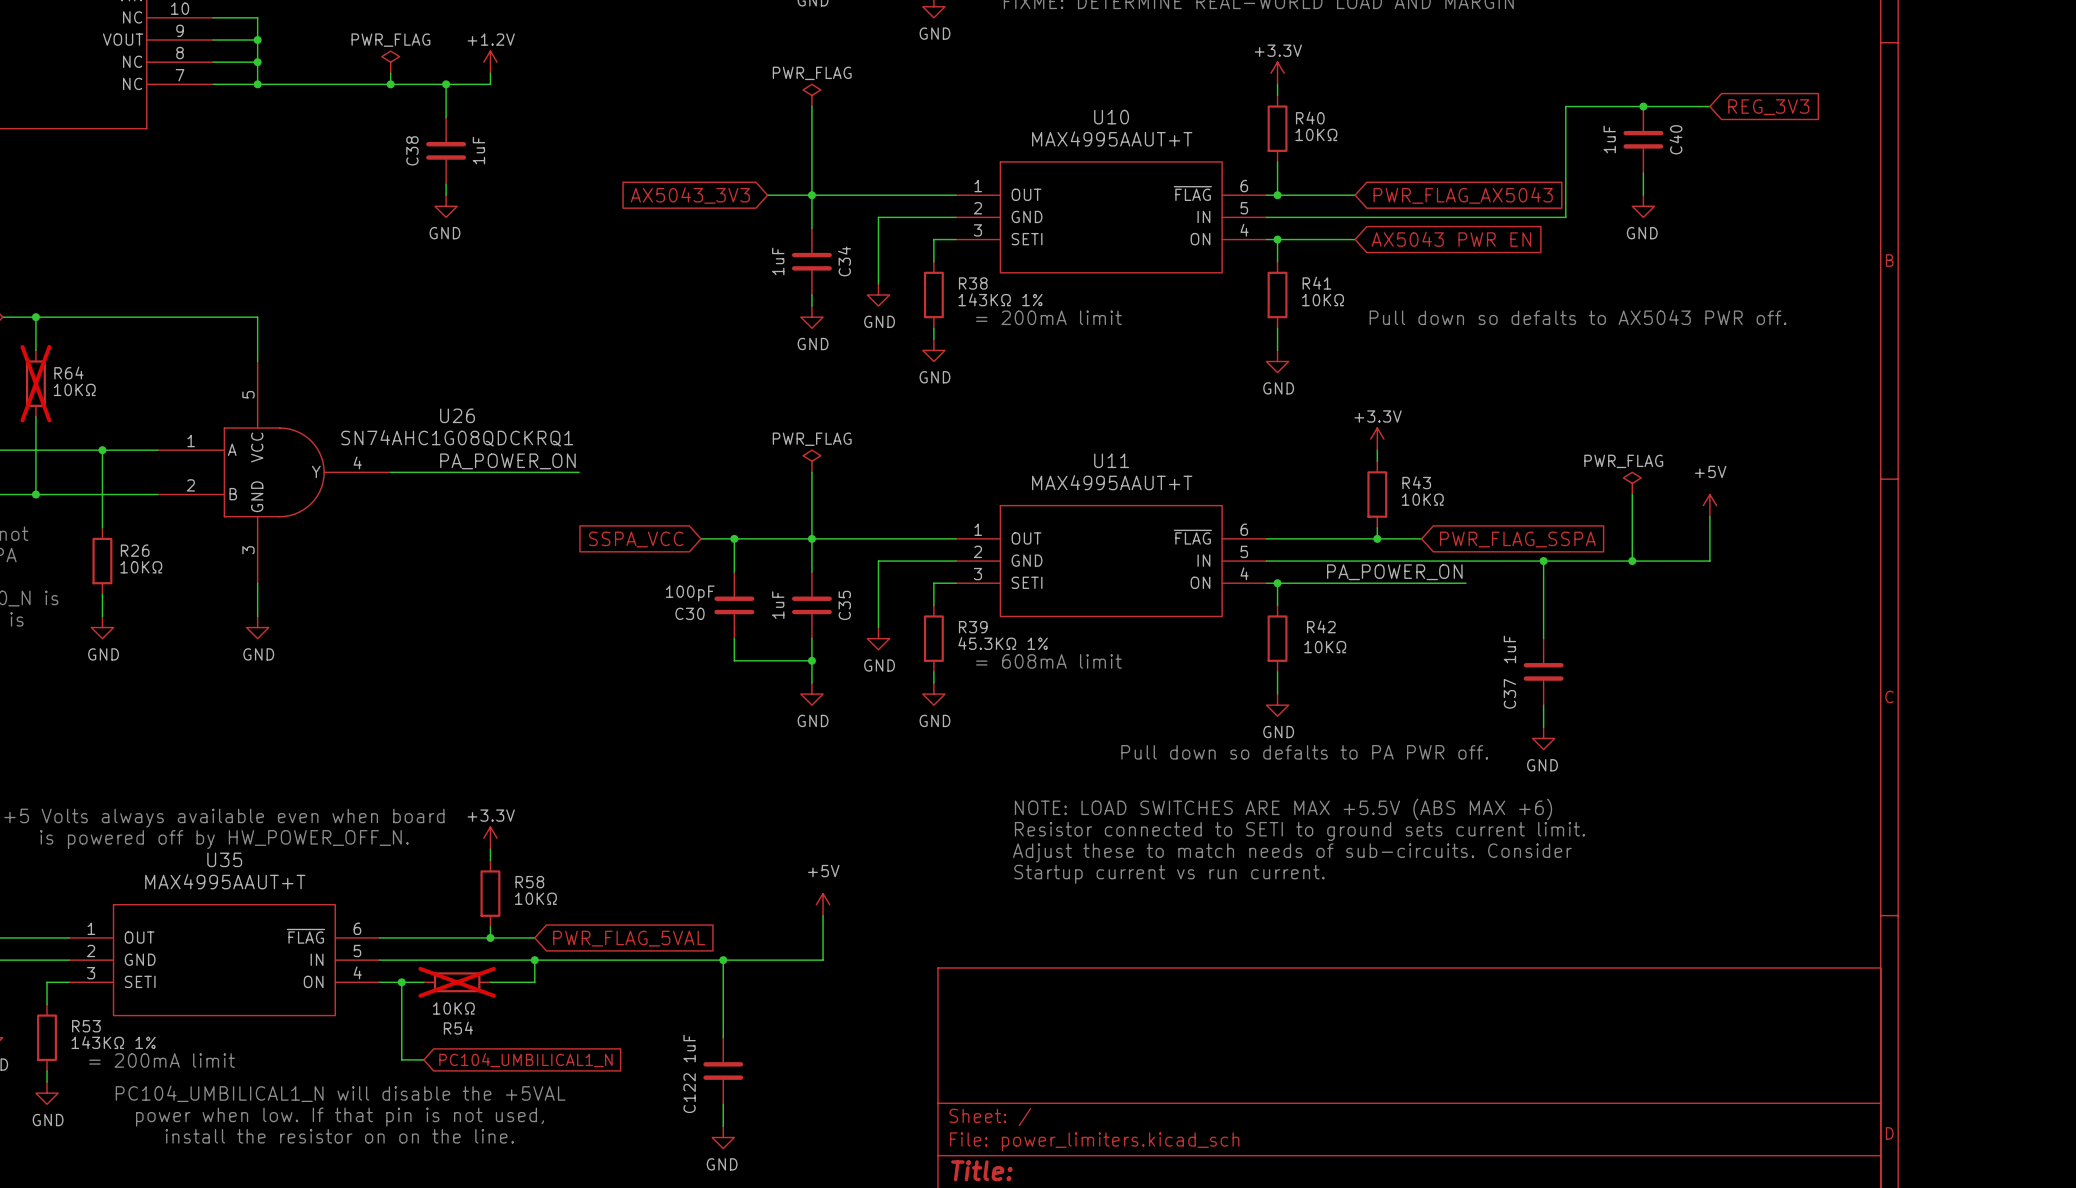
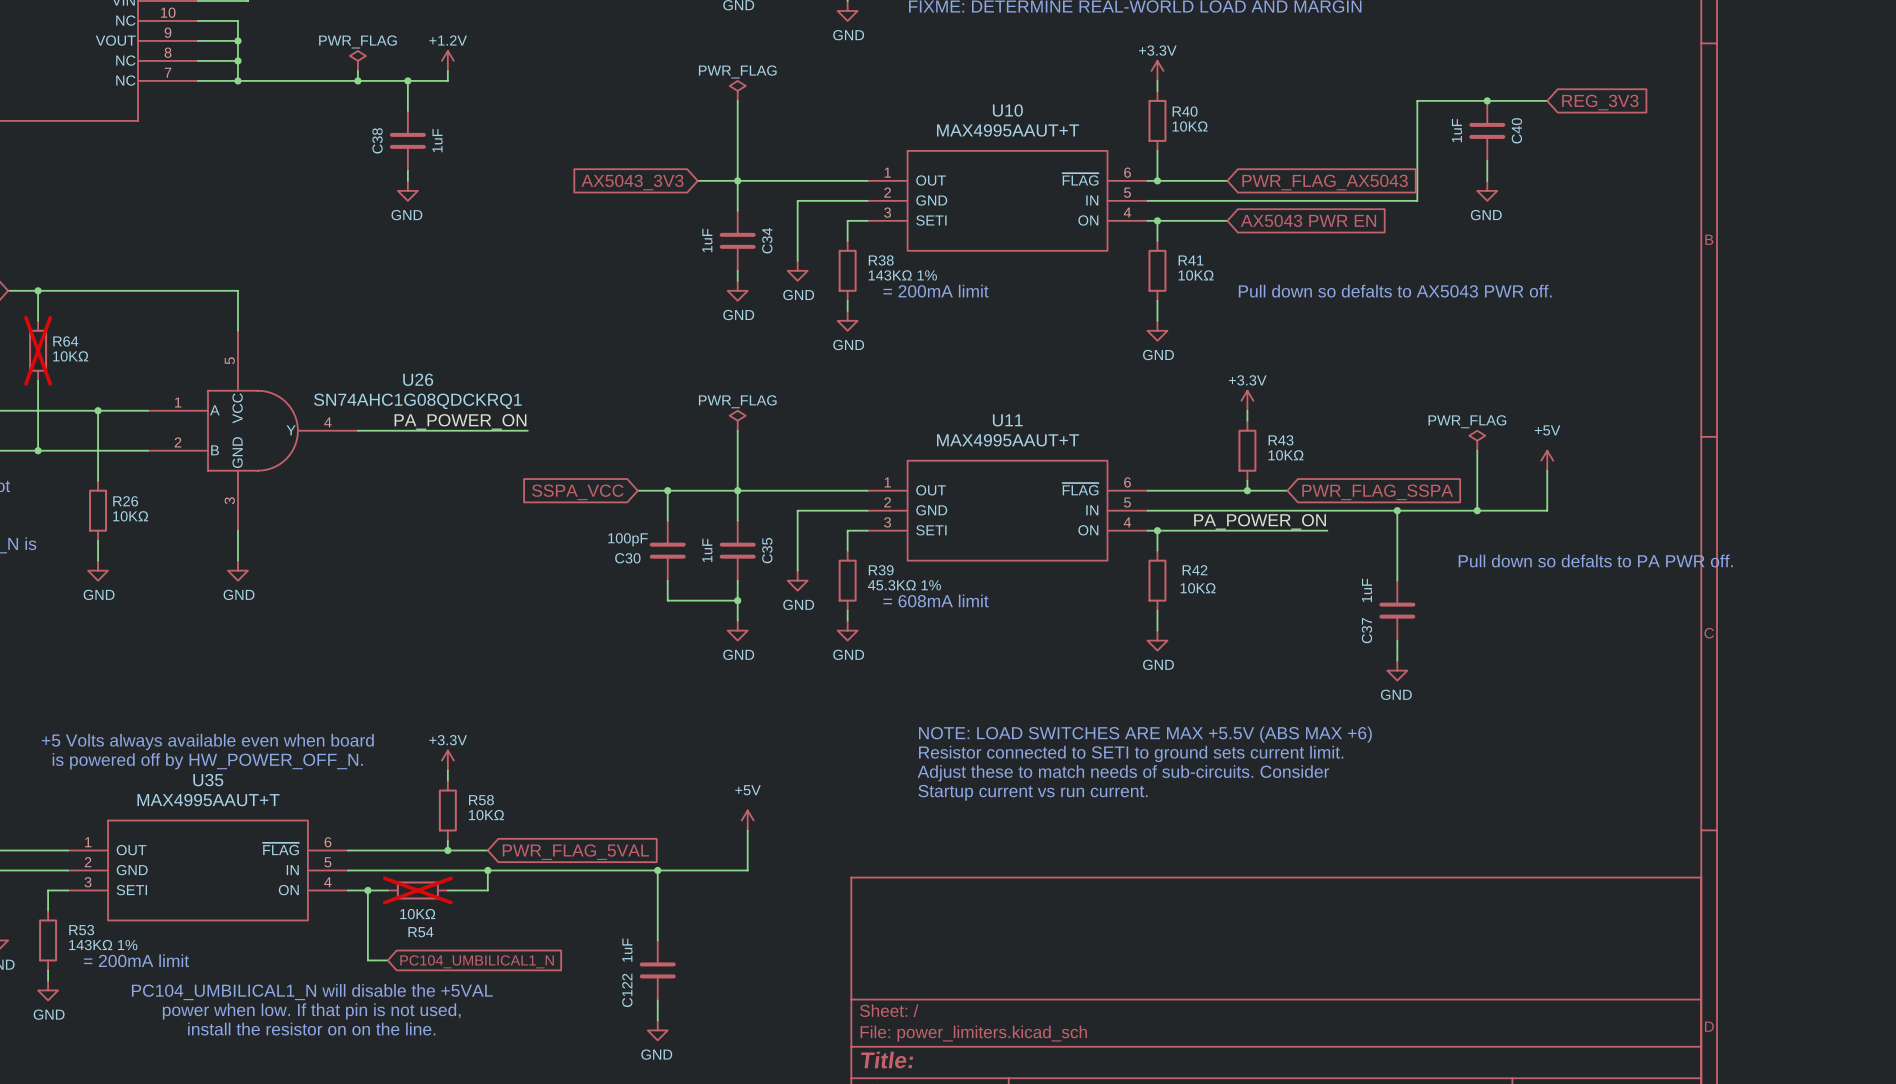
text: none -> Pull down so defalts to PA PWR off. (1595, 560)
text: Pull down so defalts to PA PWR off. (1304, 752) -> none

